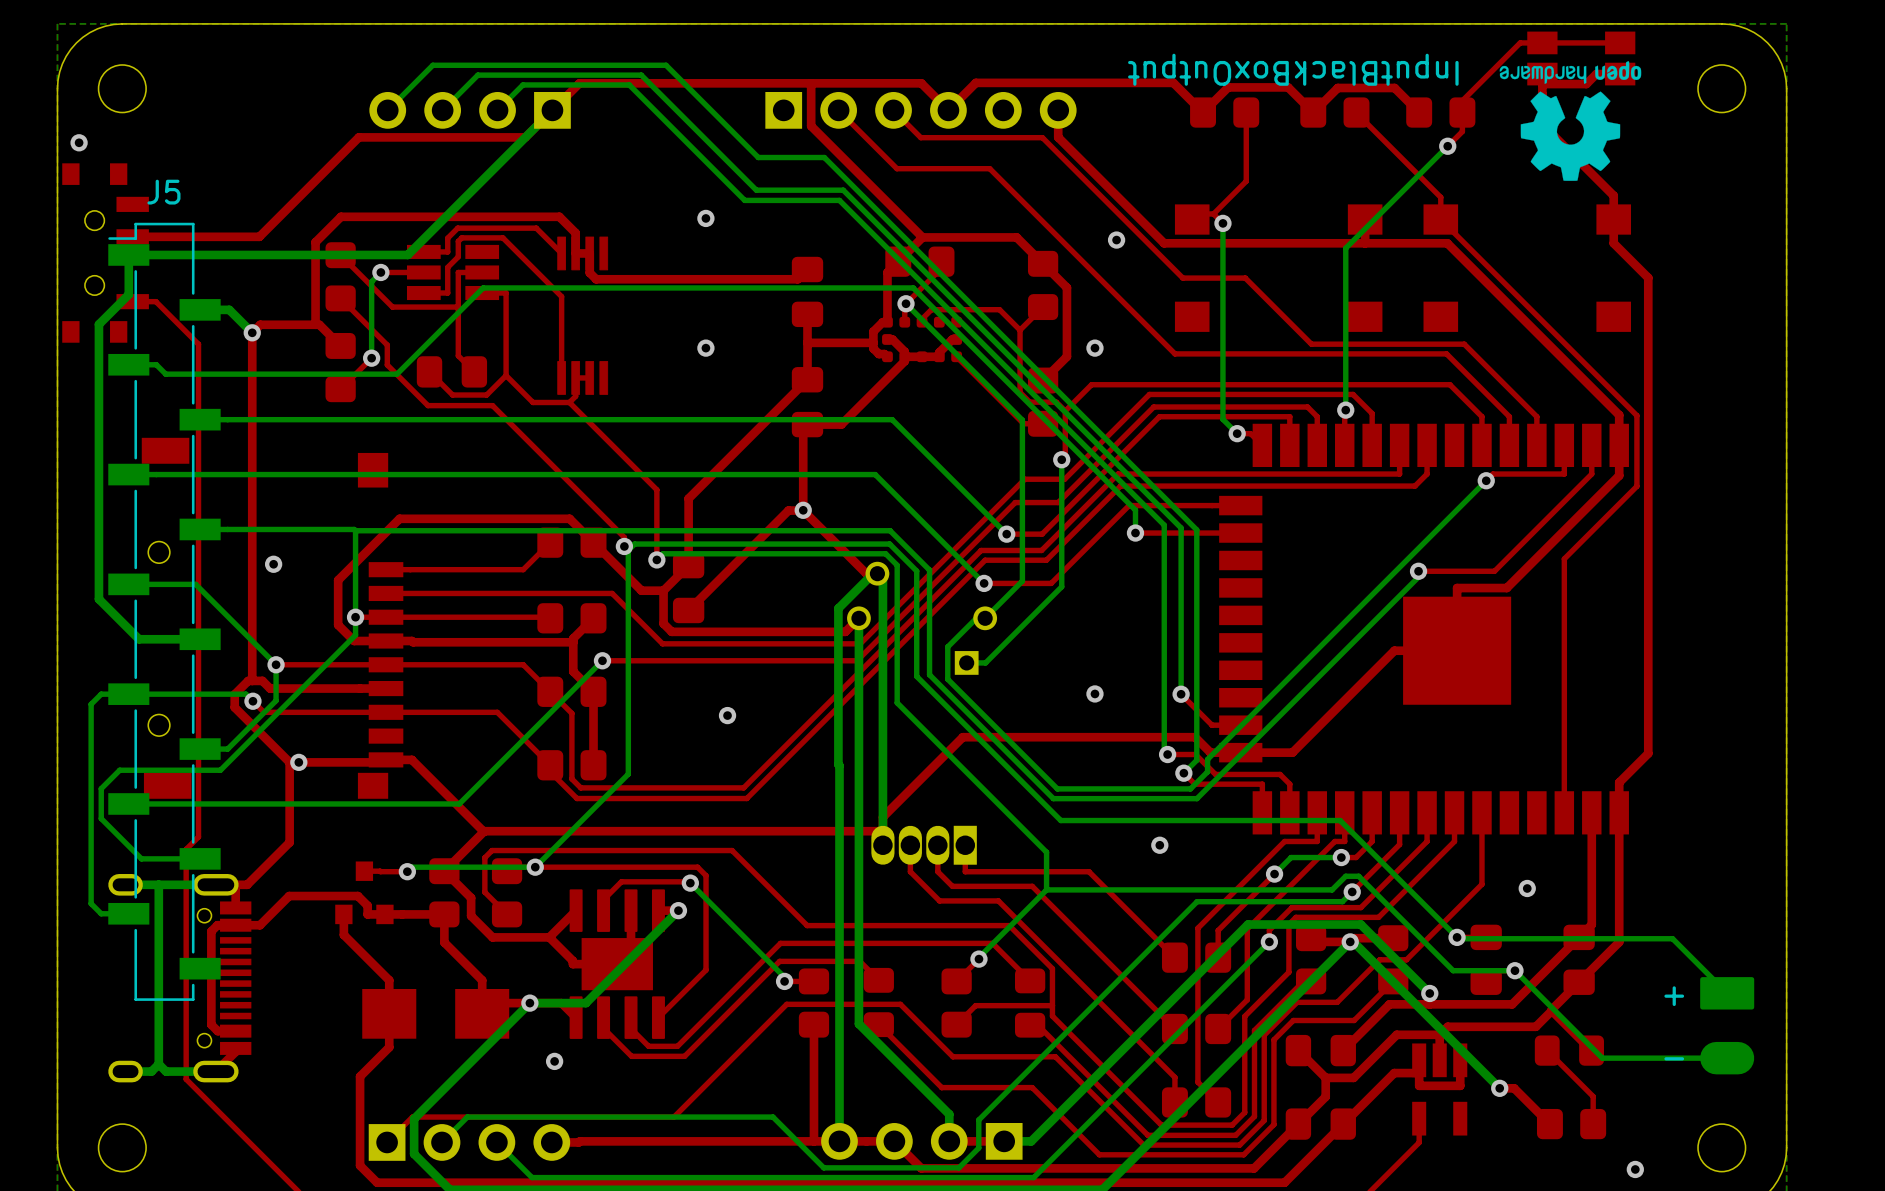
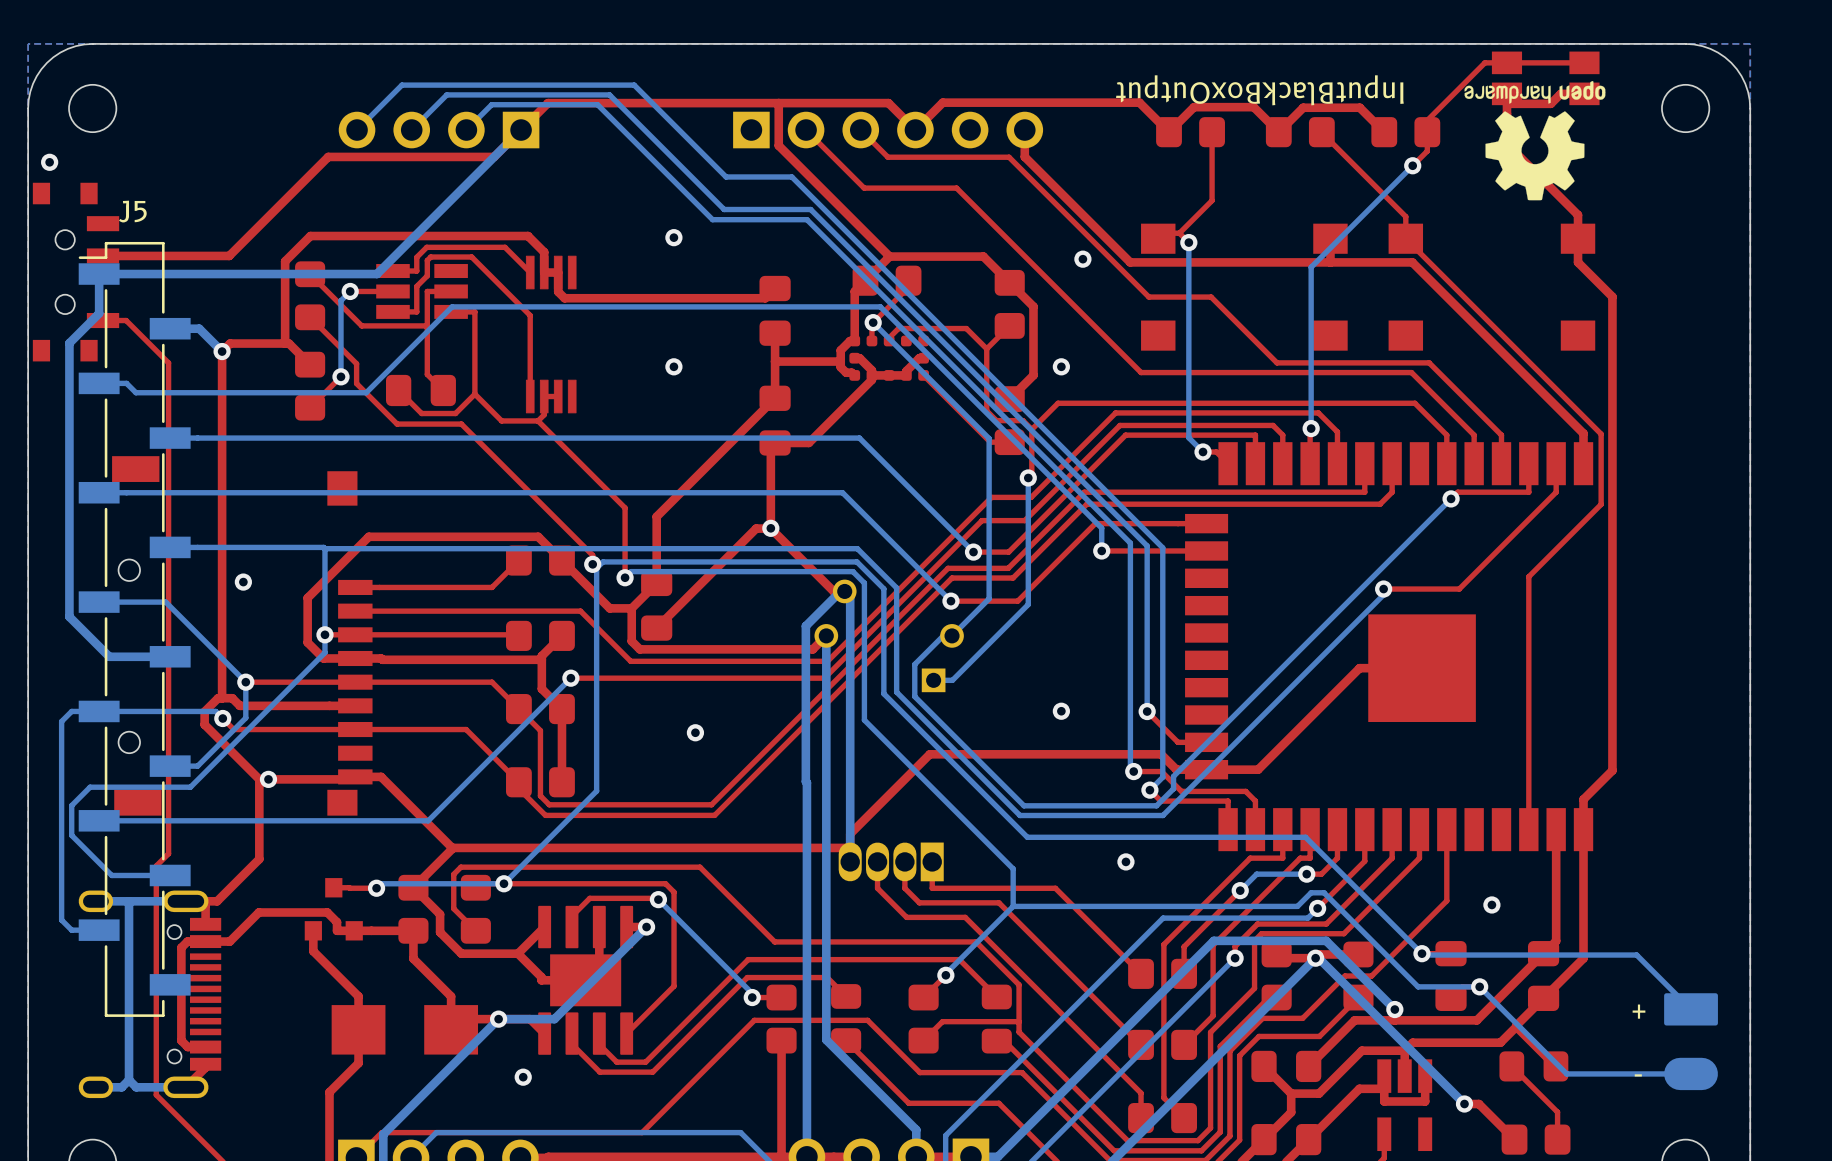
top track: (1619, 445) (1619, 475) (1506, 588) (1457, 588) (1457, 650) -> none

